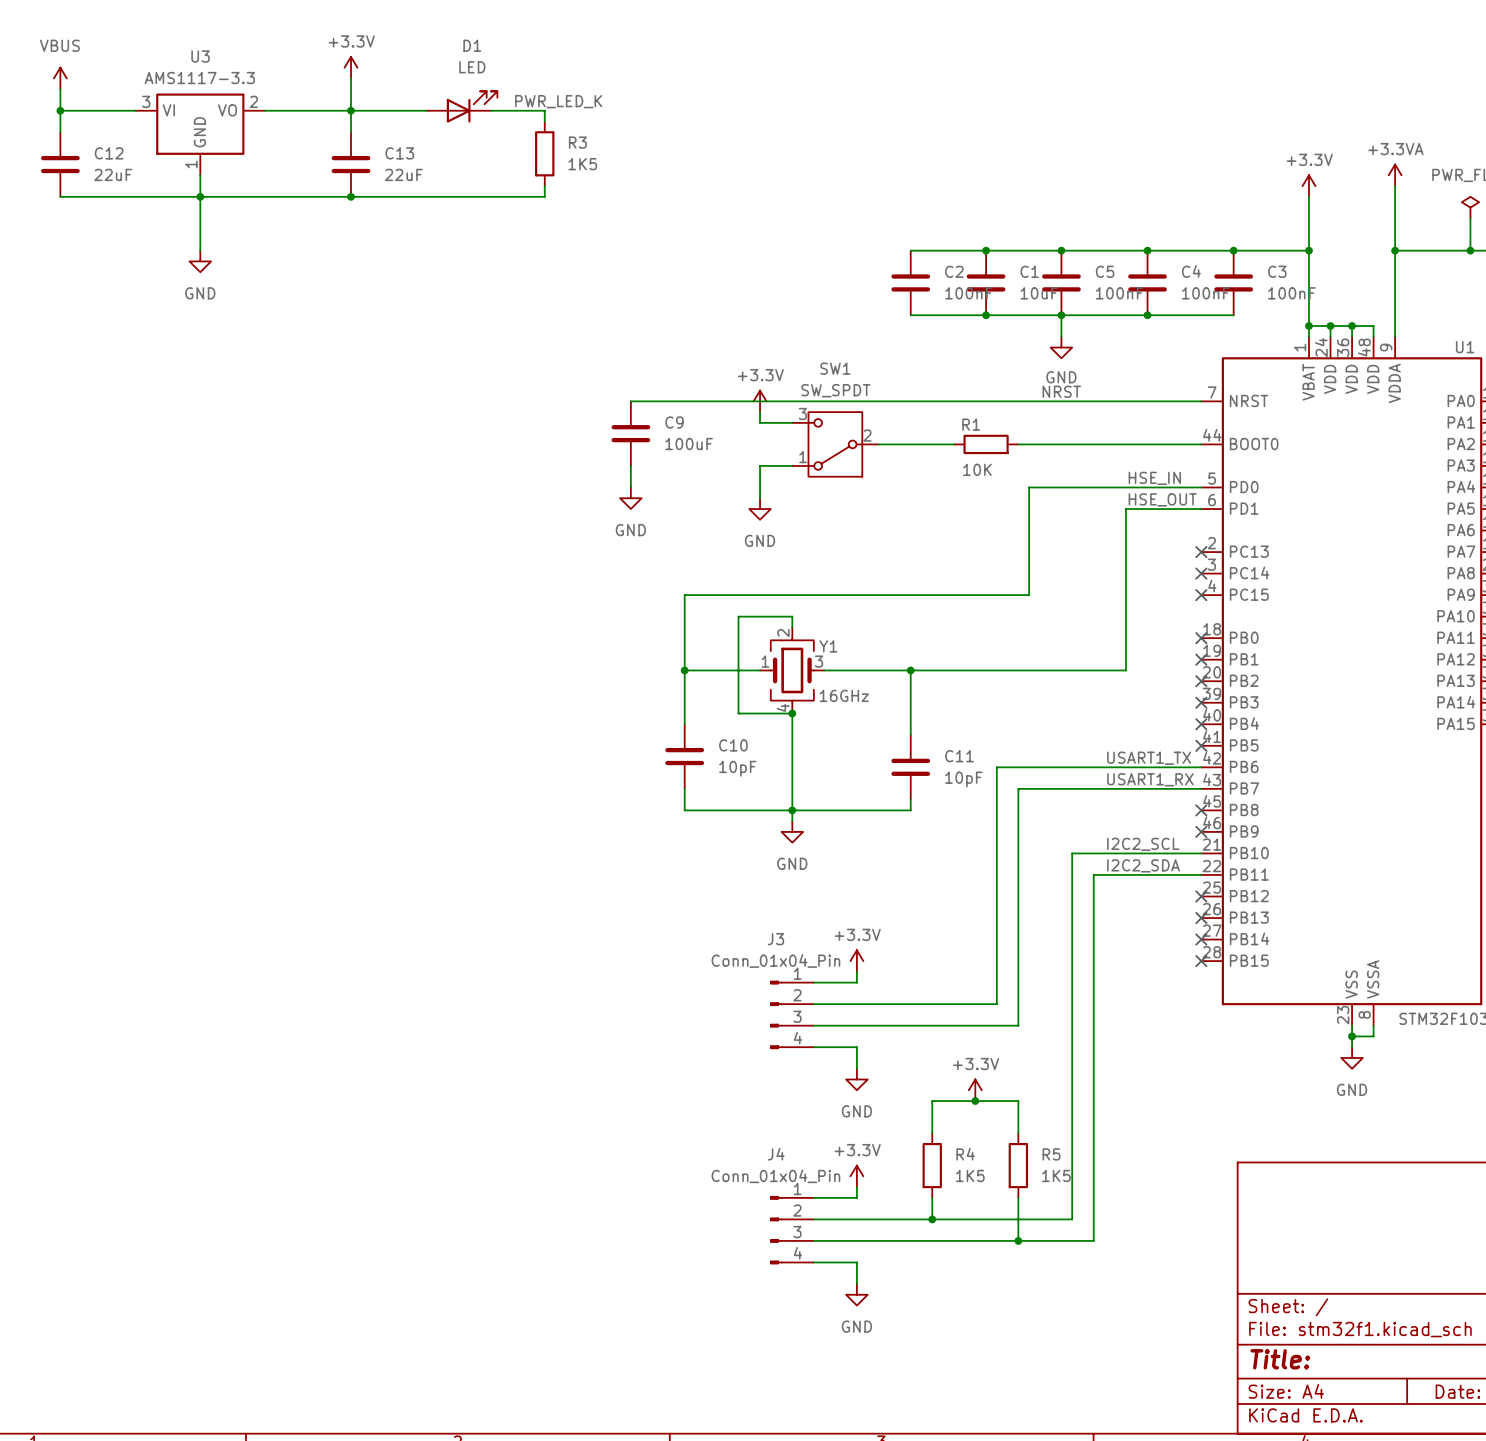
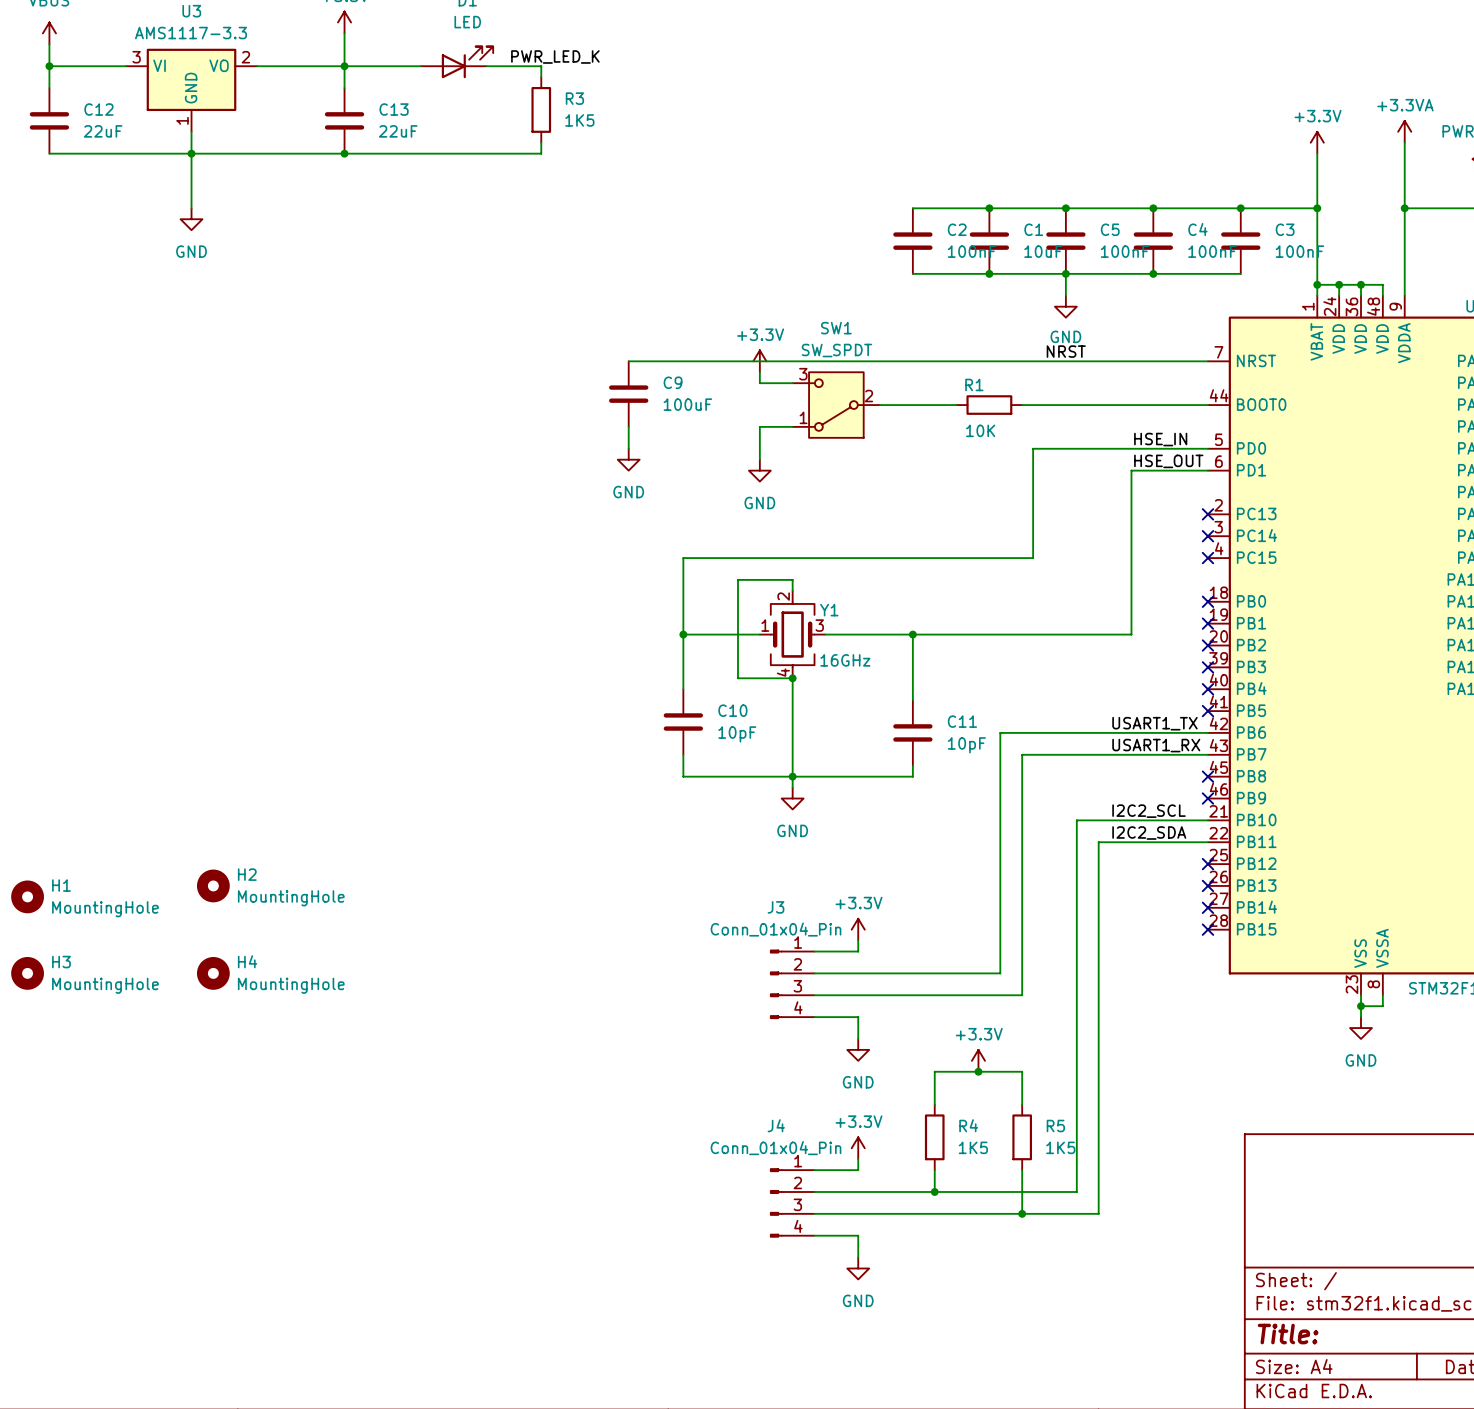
H2: none -> MountingHole (213, 885)
H1: none -> MountingHole (27, 896)
H3: none -> MountingHole (27, 973)
H4: none -> MountingHole (213, 973)

